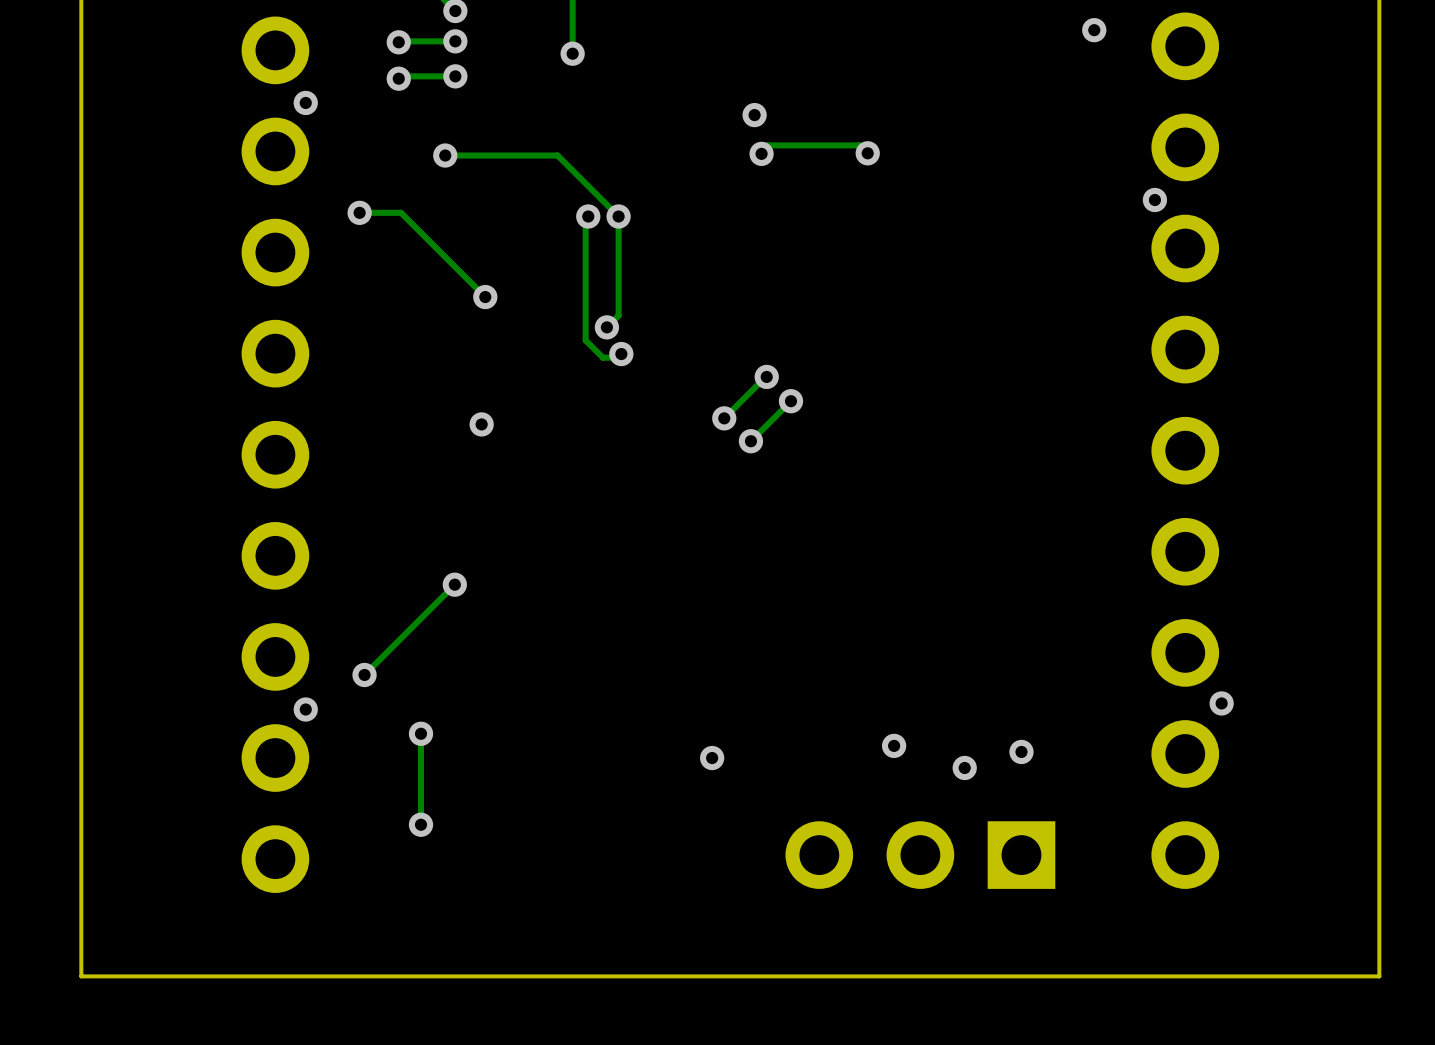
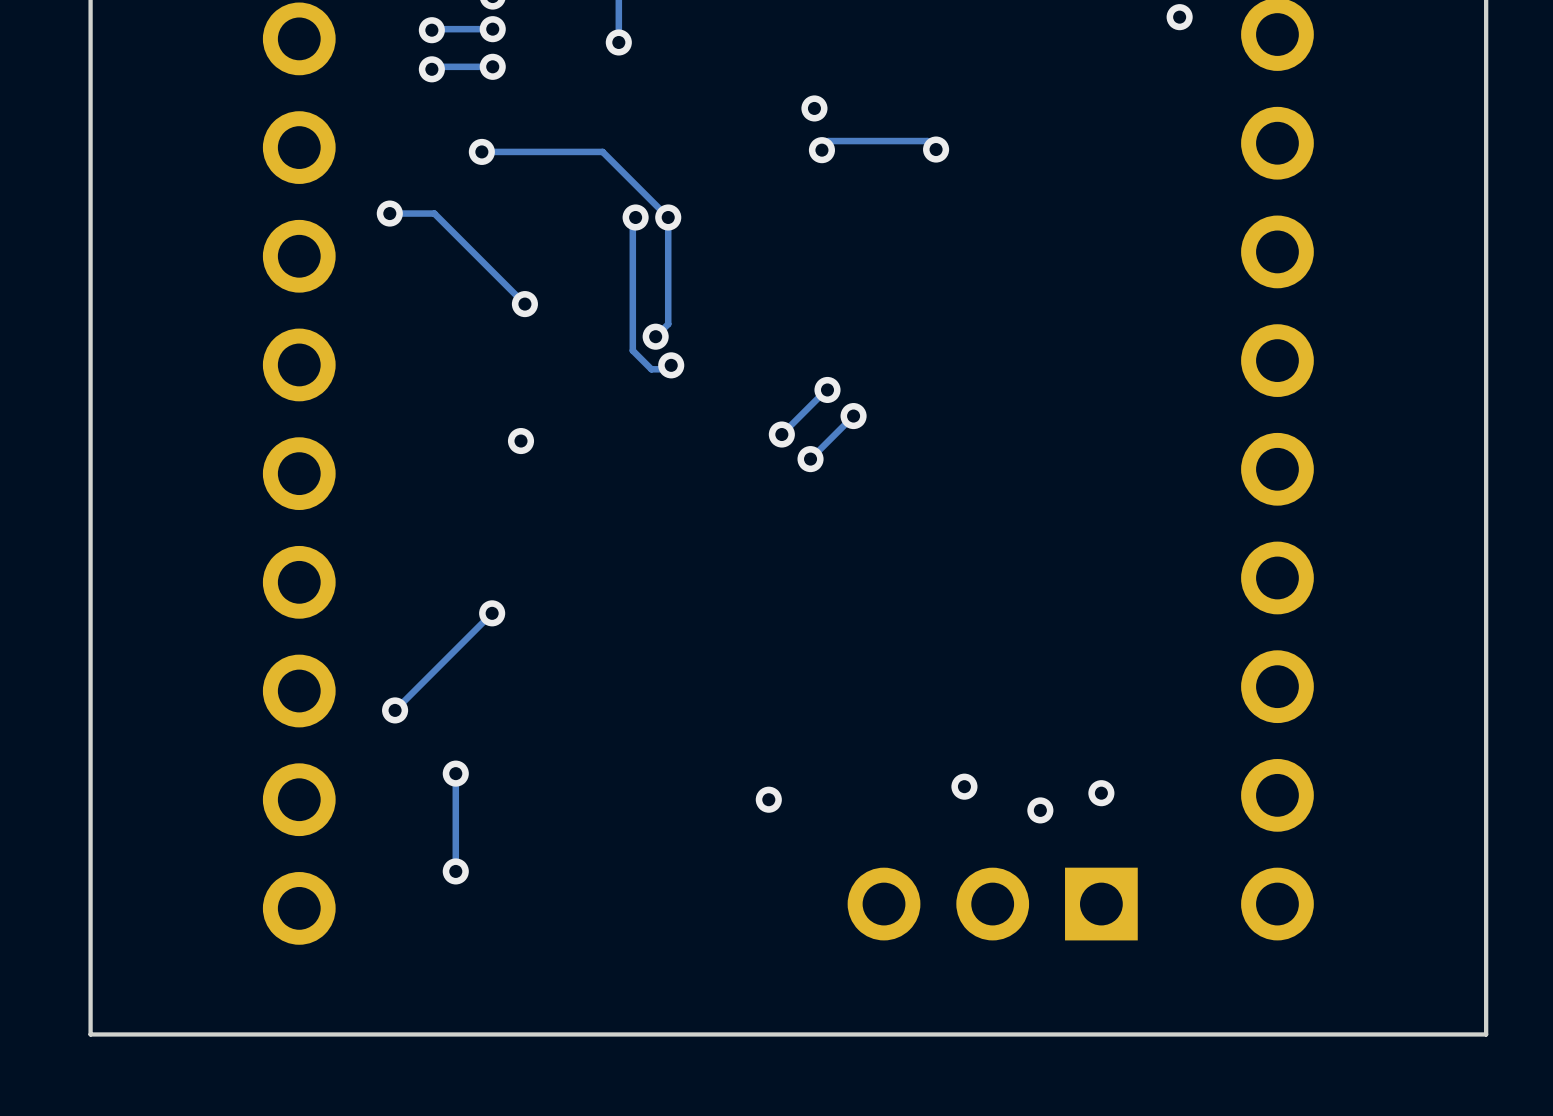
via: (305, 102) -> none
via: (1154, 200) -> none
via: (1221, 703) -> none
via: (305, 709) -> none

